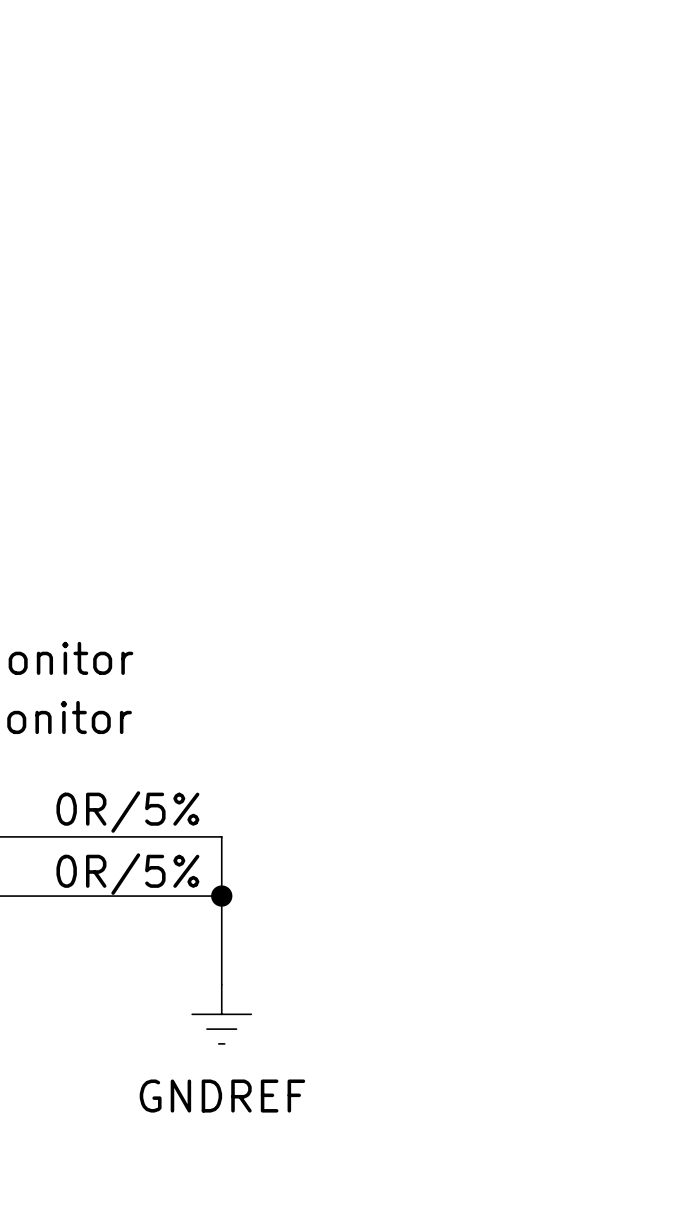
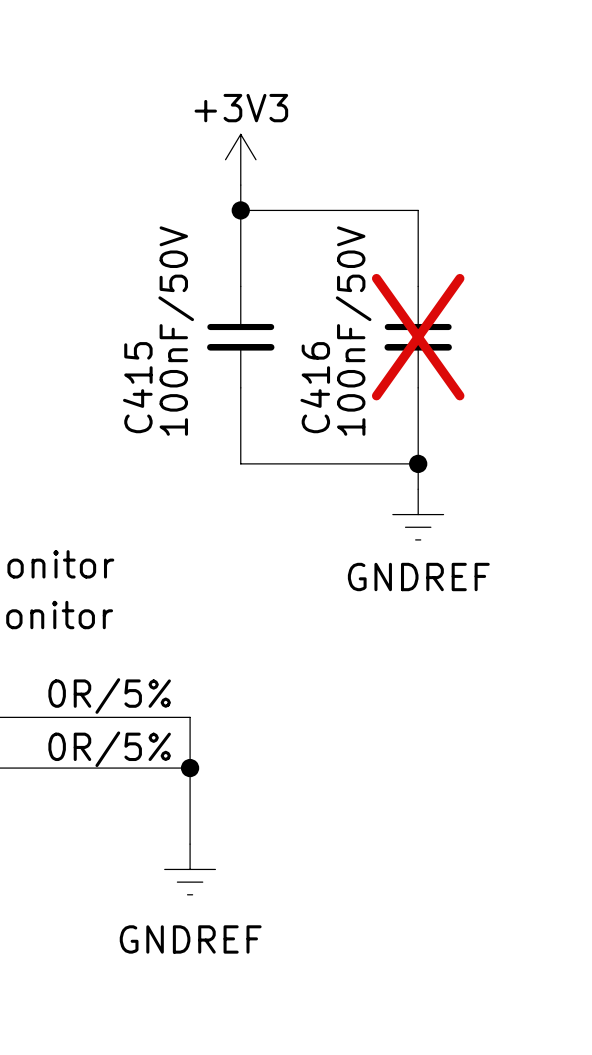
power symbol: none -> +3V3 (240, 159)
wire: none -> (240, 185) (240, 286)
wire: none -> (240, 210) (418, 210) (418, 286)
junction: none -> (240, 210)
C415: none -> 100nF/50V (240, 337)
C416: none -> 100nF/50V (418, 337)
wire: none -> (240, 387) (240, 463) (418, 463)
wire: none -> (418, 387) (418, 489)
junction: none -> (418, 463)
power symbol: none -> GNDREF (418, 514)

